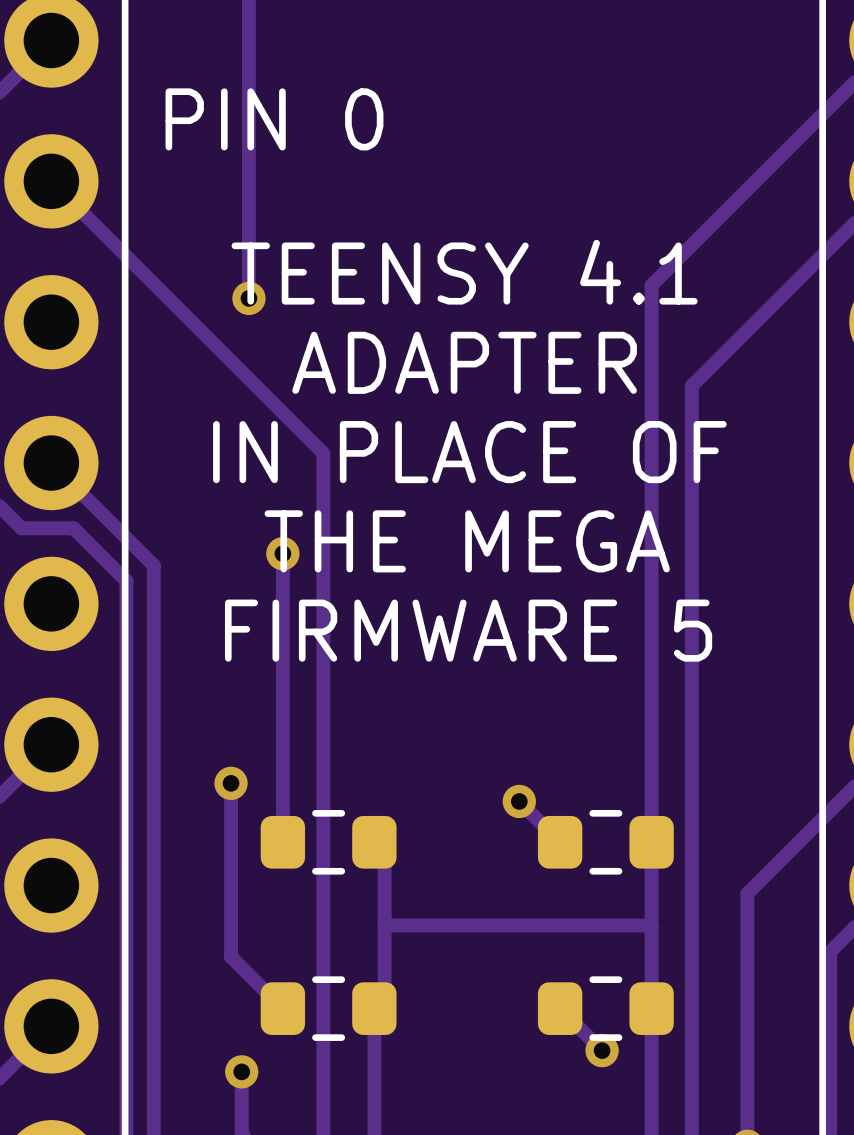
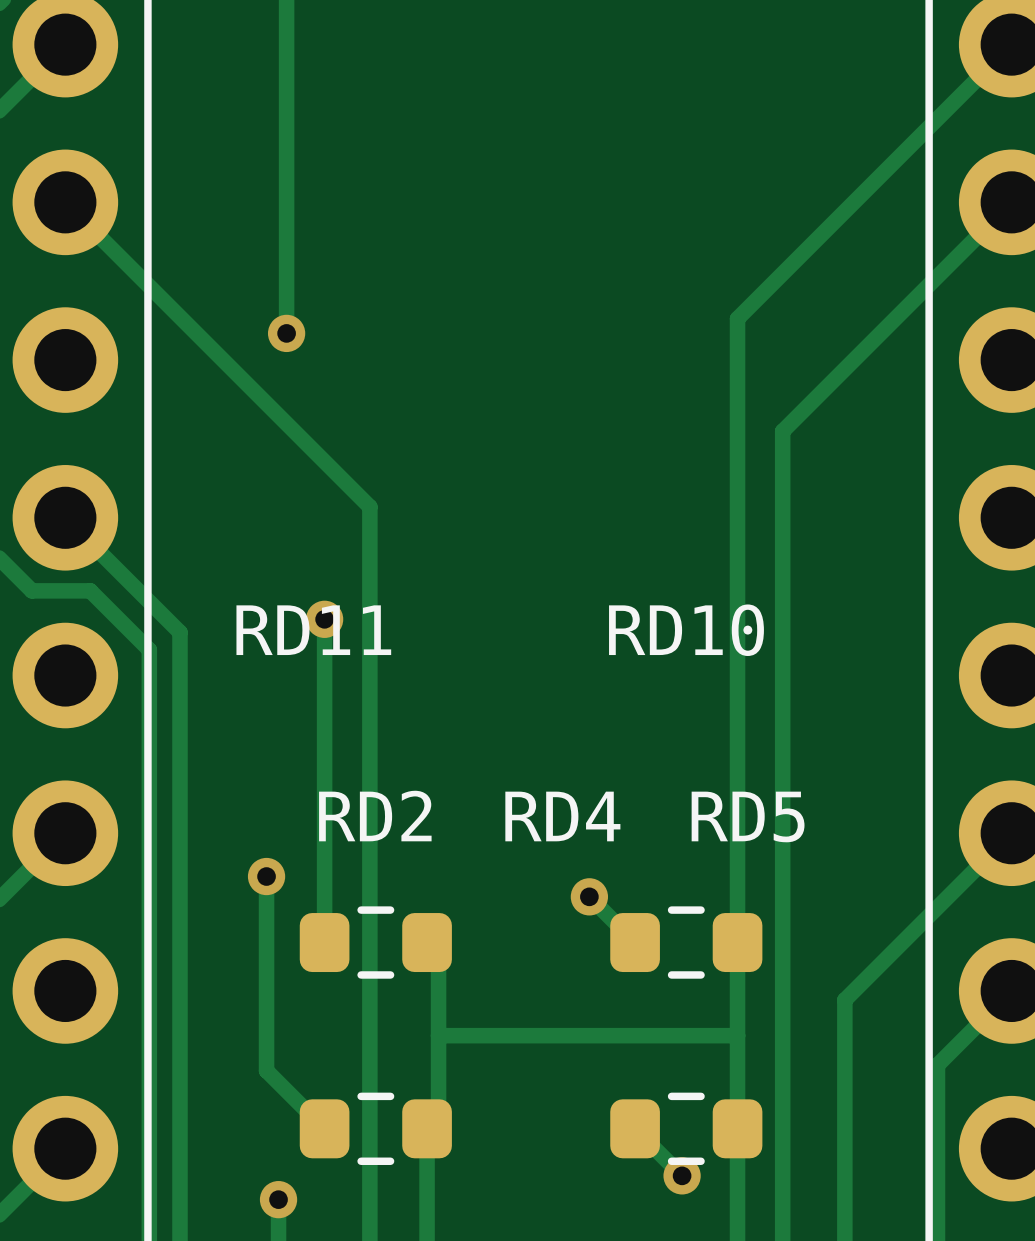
text: PIN 0 (274, 119) -> none
text: TEENSY 4.1 (464, 272) -> none
text: ADAPTER (464, 362) -> none
text: IN PLACE OF (469, 452) -> none
text: THE MEGA (467, 541) -> none
RD11 name: none -> RD11 (313, 630)
RD10 name: none -> RD10 (686, 630)
text: FIRMWARE 5 (468, 630) -> none
RD4 name: none -> RD4 (562, 816)
RD2 name: none -> RD2 (375, 816)
RD5 name: none -> RD5 (748, 816)

